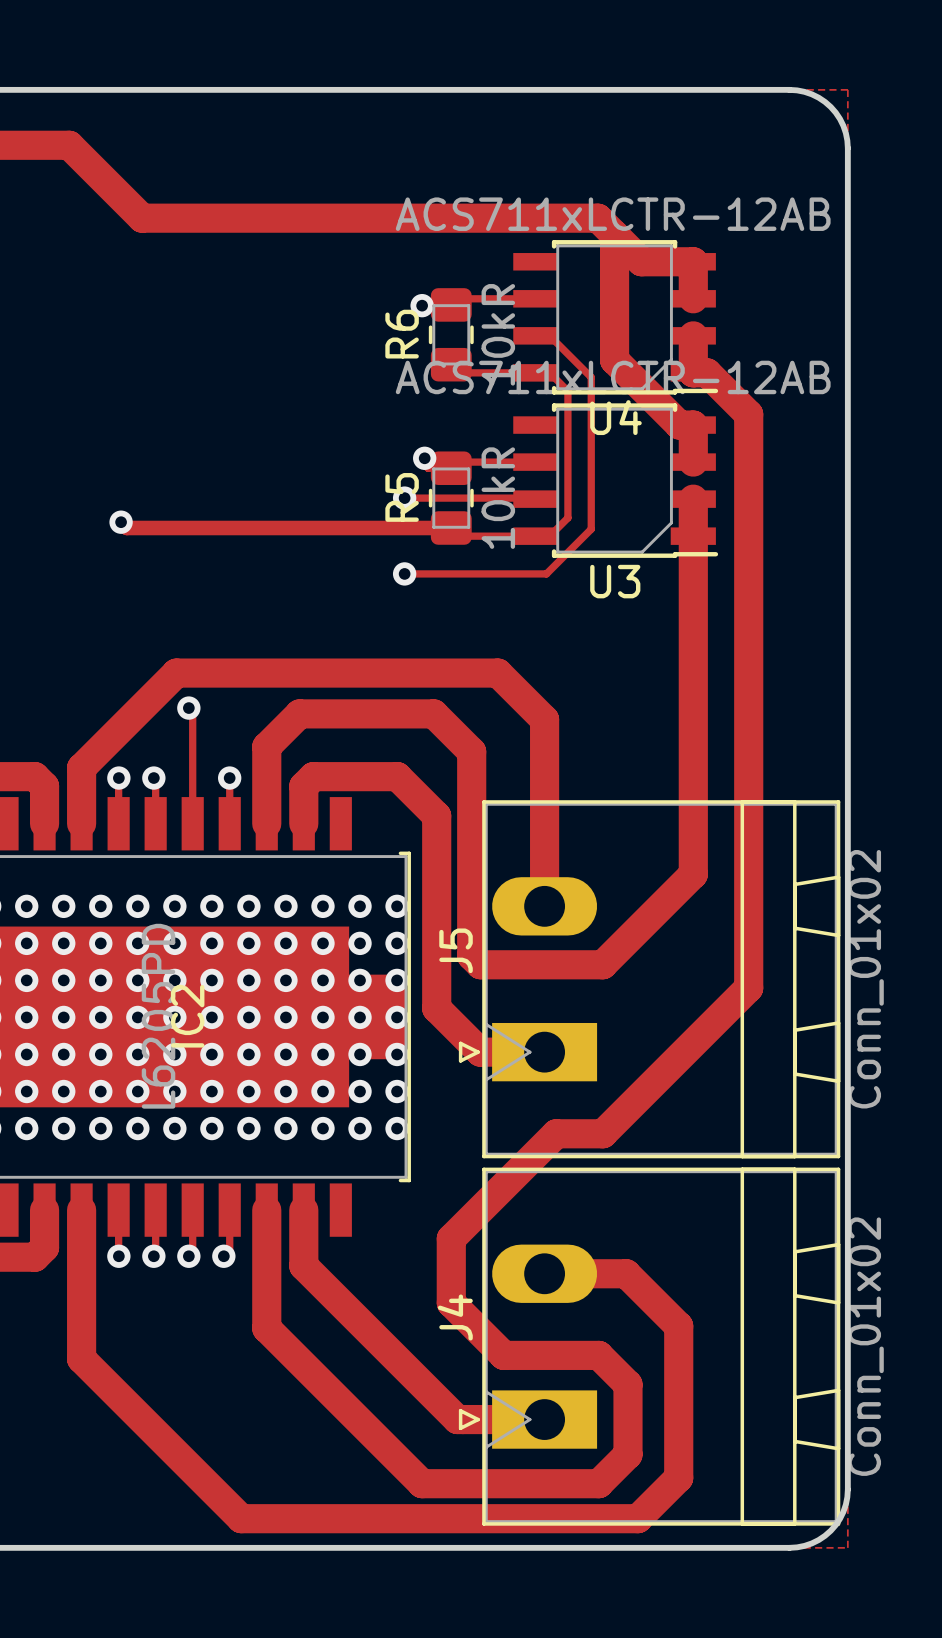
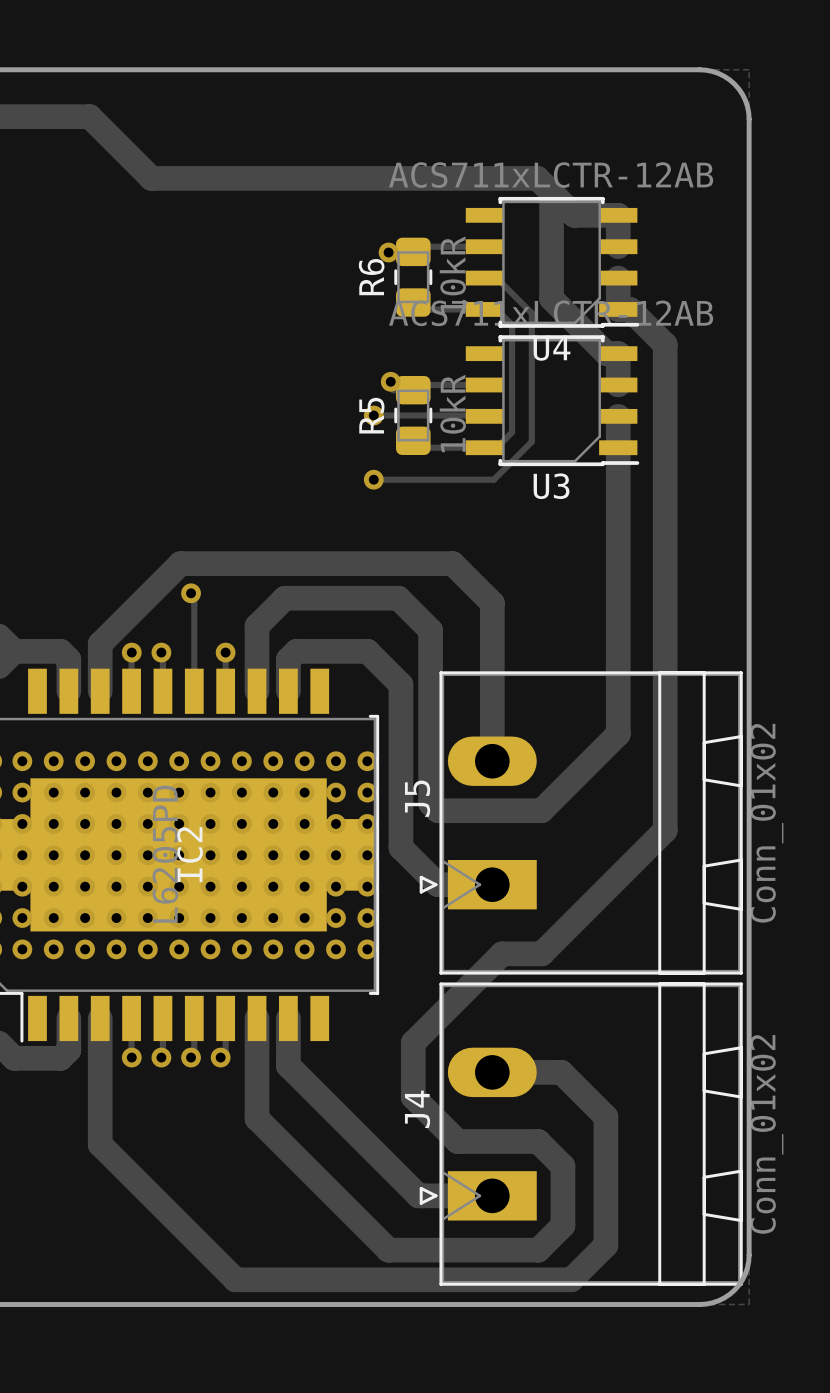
track: (121, 522) (126, 528) (451, 528) -> none
via: (121, 522) -> none

